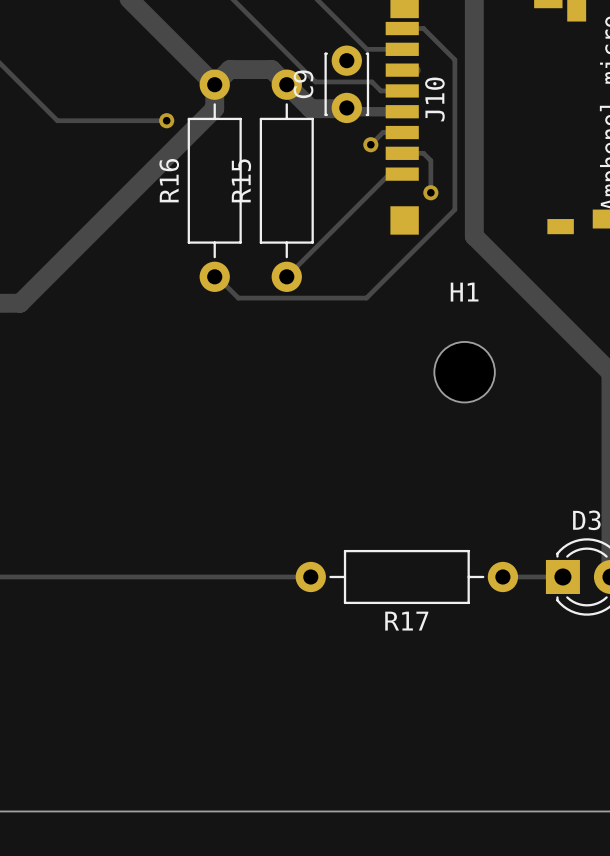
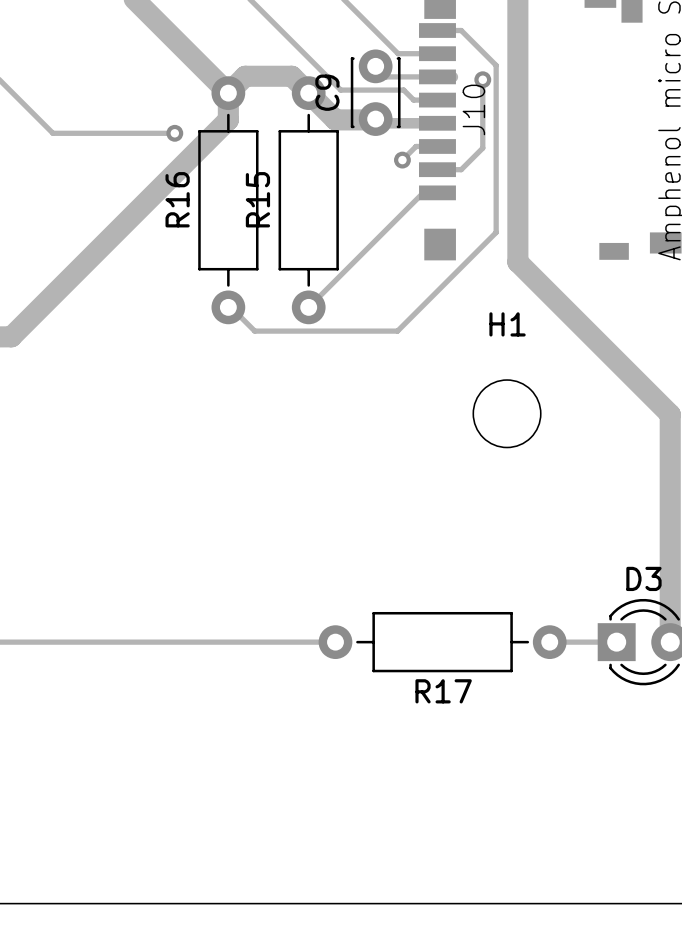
track: none -> (375, 66) (386, 76) (437, 76)
via: none -> (482, 79)
track: (423, 153) (430, 160) (430, 192) -> (461, 169) (482, 148) (482, 79)
via: (430, 192) -> none

